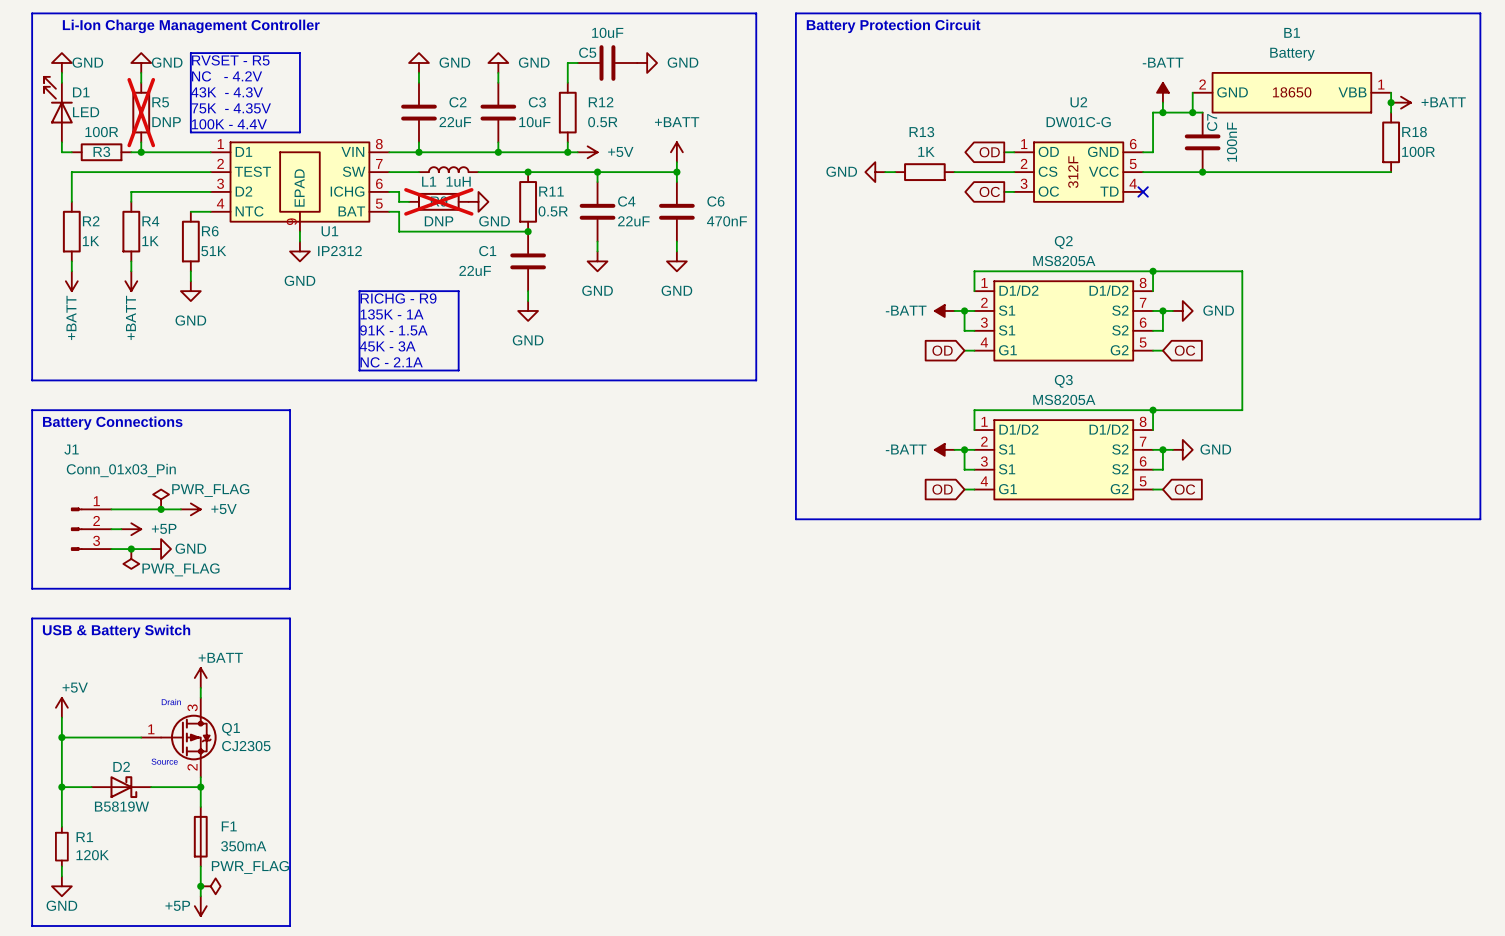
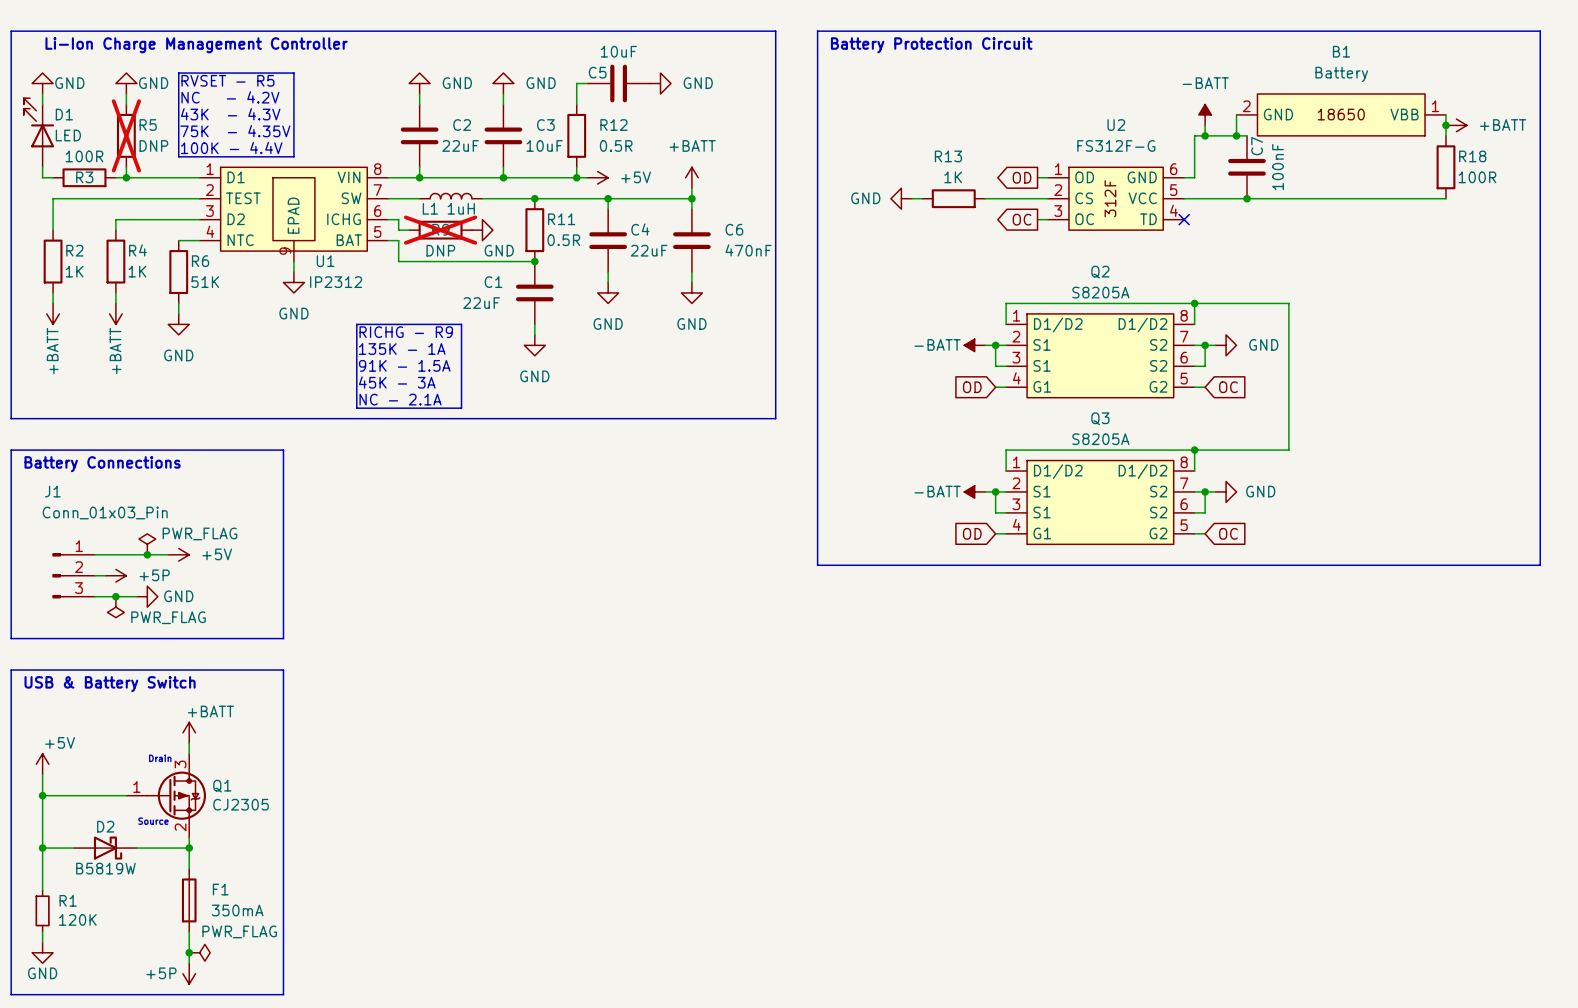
U2 value: DW01C-G (1078, 122) -> FS312F-G (1116, 145)
Q2 value: MS8205A (1064, 261) -> S8205A (1100, 292)
Q3 value: MS8205A (1064, 399) -> S8205A (1100, 439)

